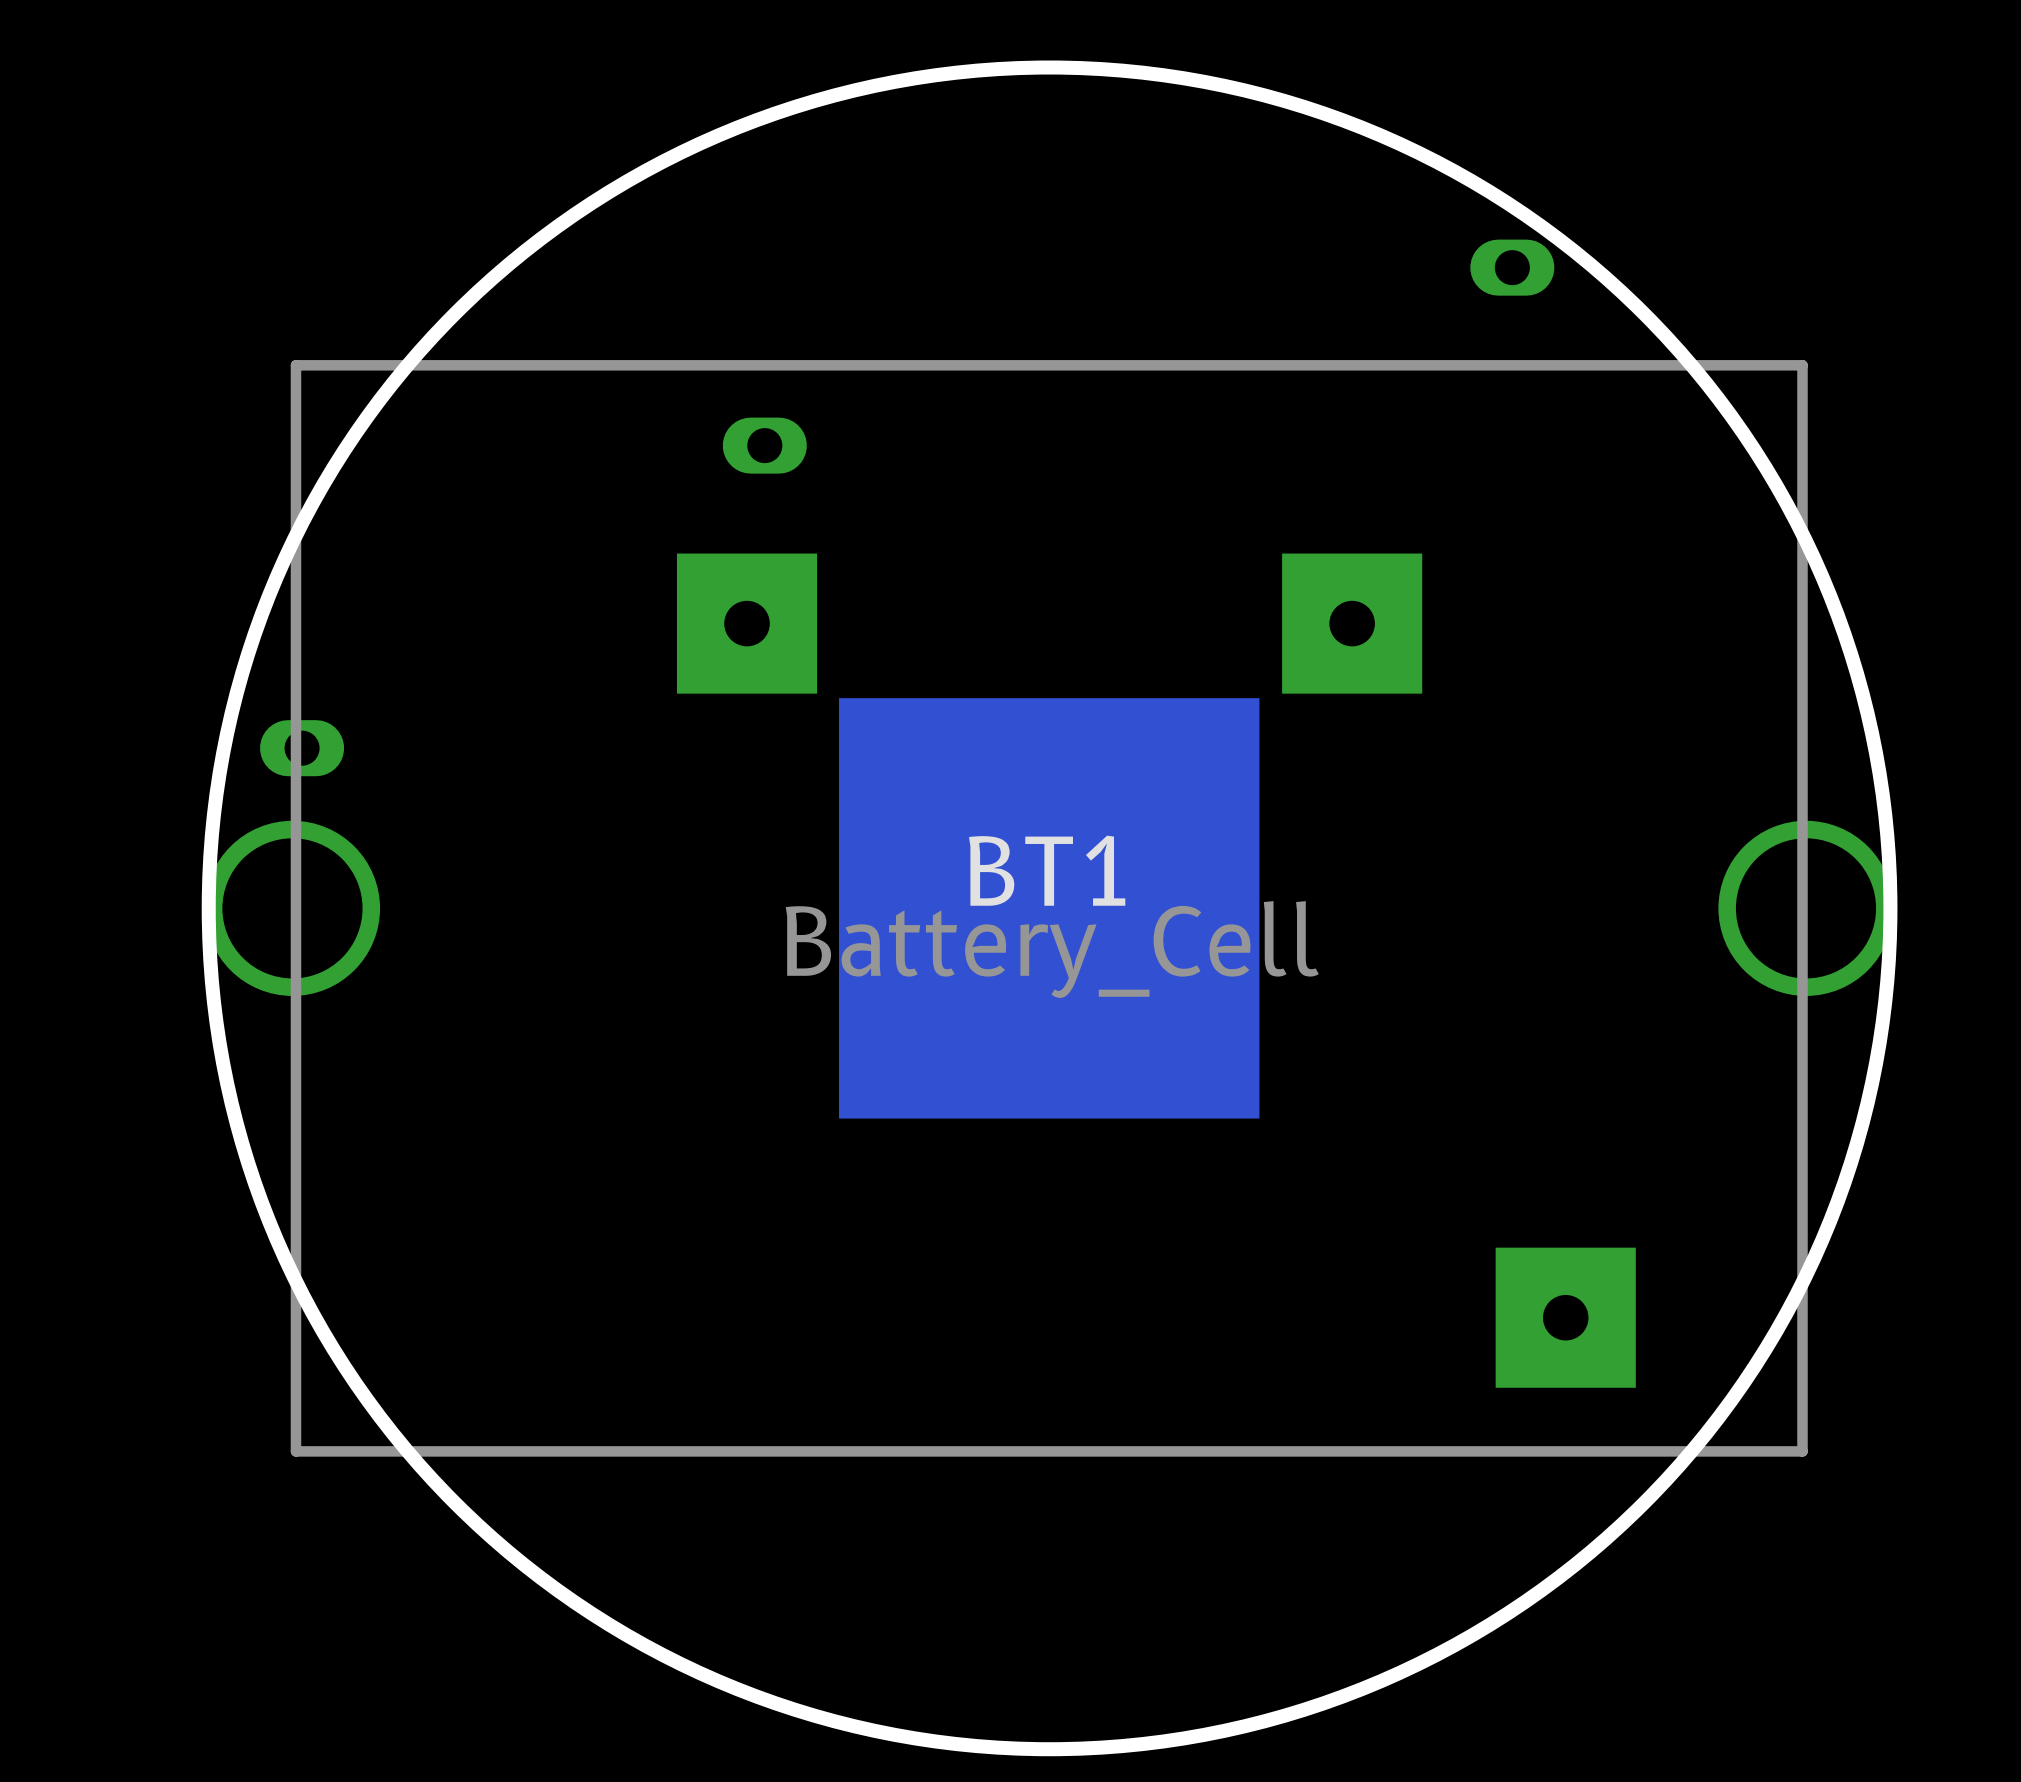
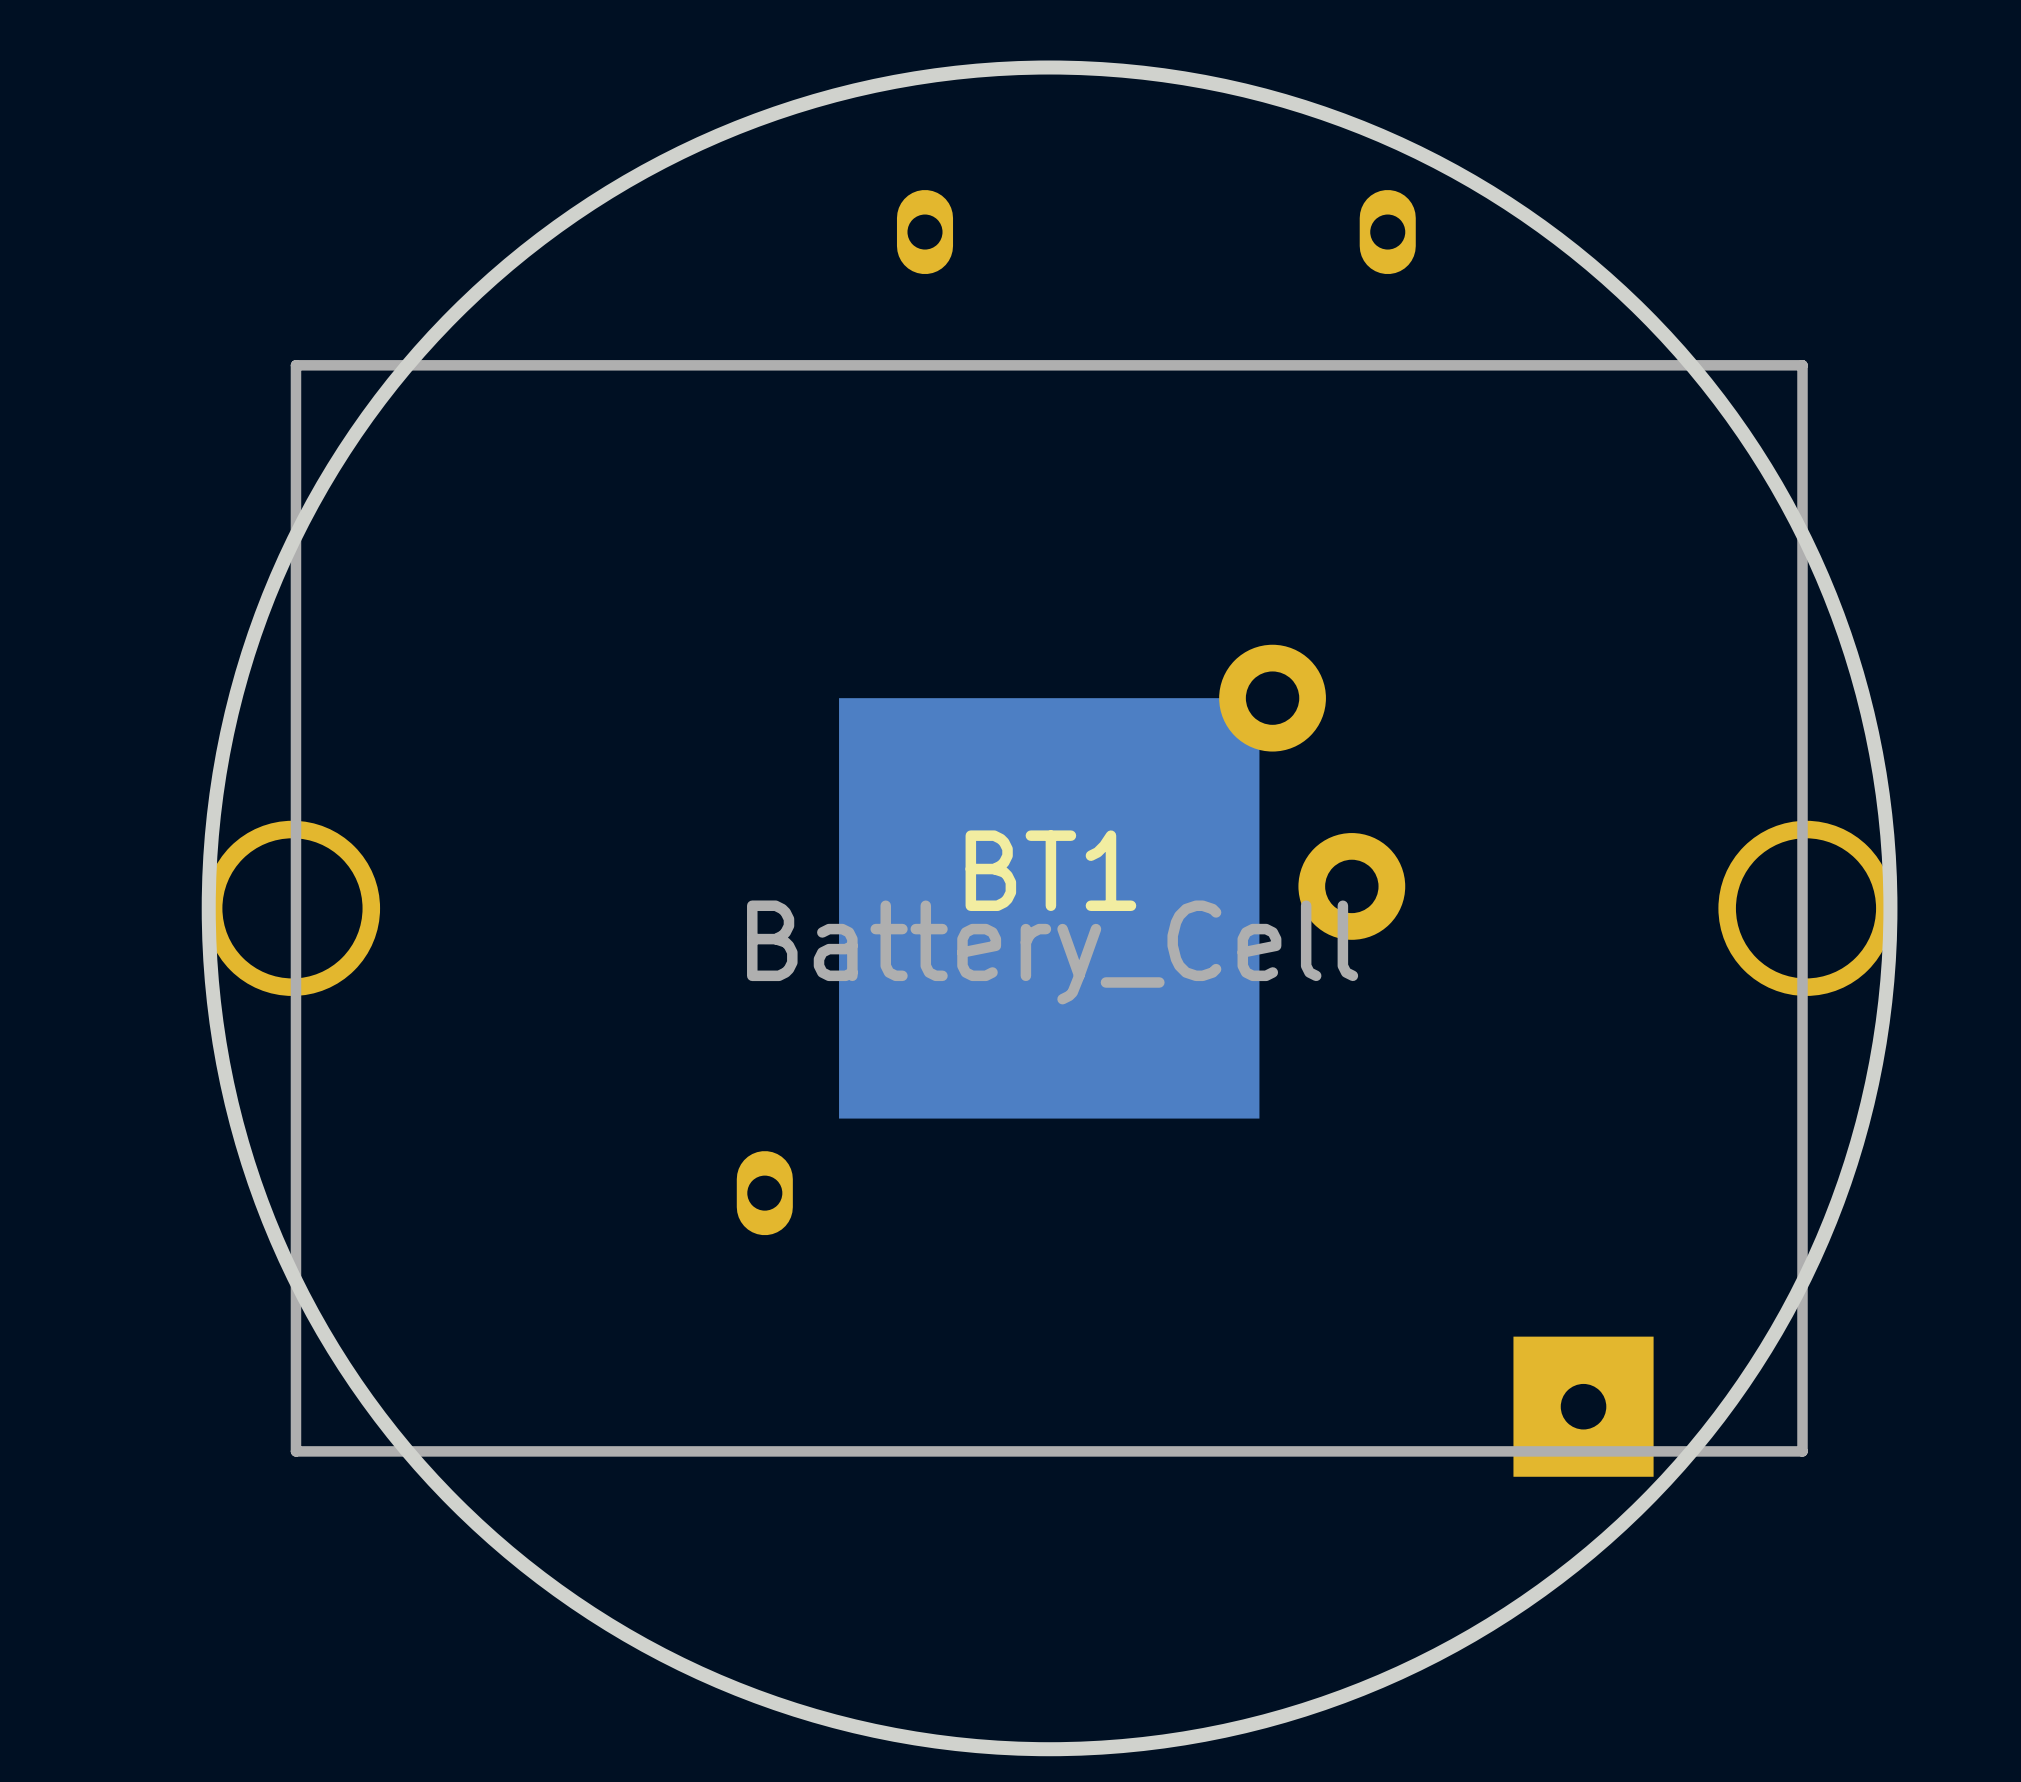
part rotation: 0° (1512, 267) -> 90° clockwise (1387, 232)
part position: (1512, 267) -> (1387, 232)
part rotation: 0° (764, 445) -> 90° clockwise (925, 232)
part position: (764, 445) -> (925, 232)
part: (747, 623) -> none
part: (1352, 623) -> none
part: (302, 748) -> none
part: none -> (1312, 792)
part: none -> (764, 1193)
part position: (1565, 1317) -> (1583, 1406)

